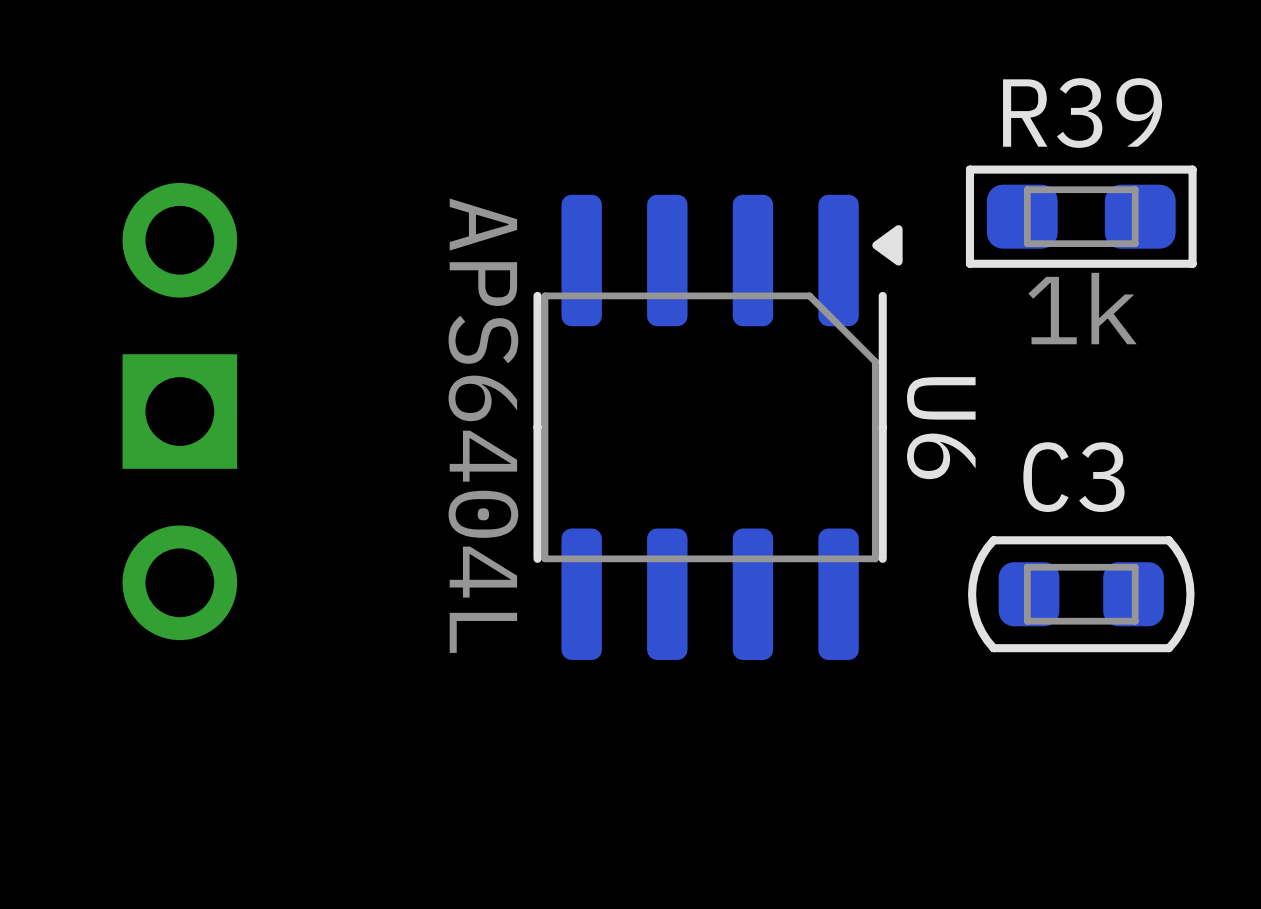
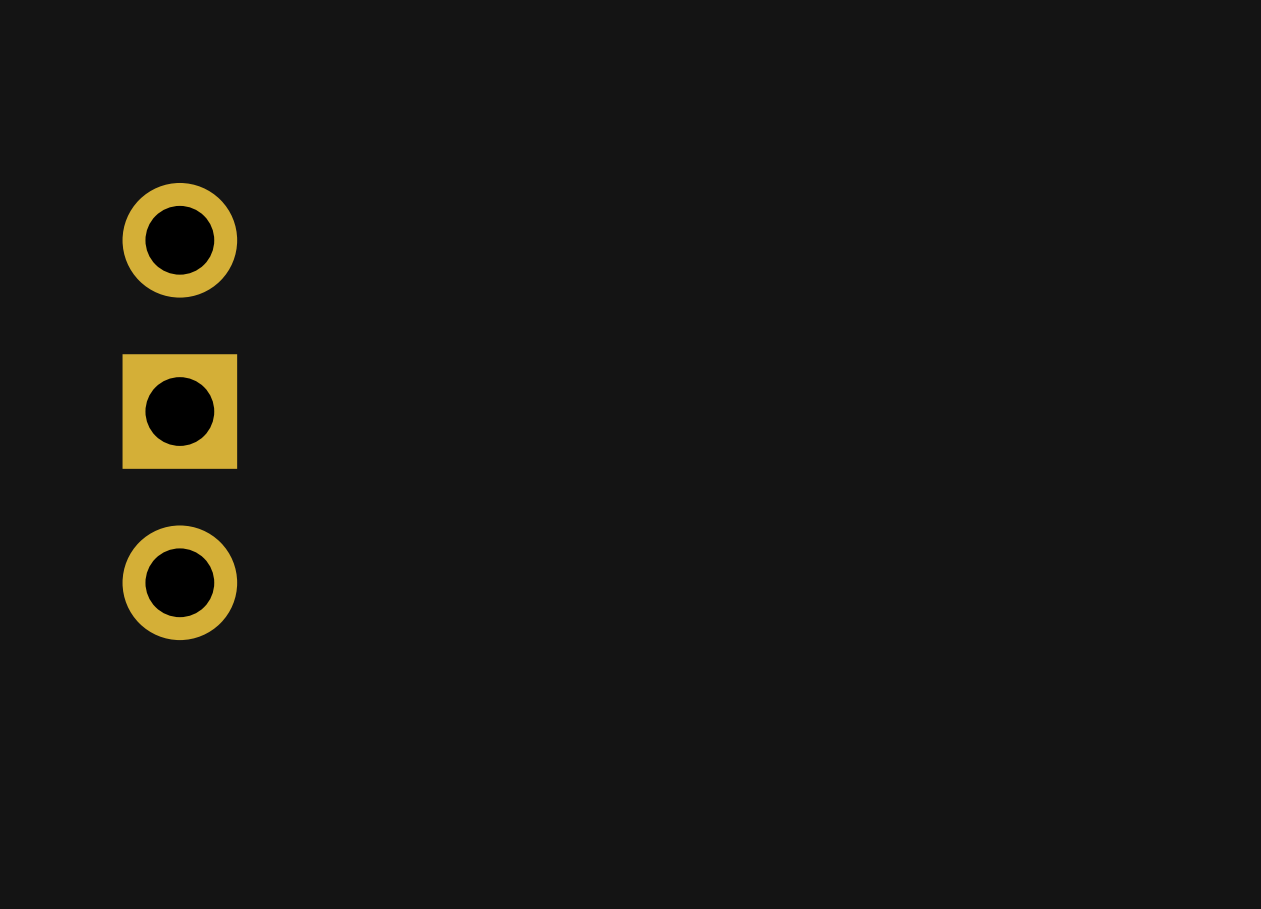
R39: 1k (1081, 216) -> none
U6: APS6404L (718, 427) -> none
C3: (1081, 594) -> none

